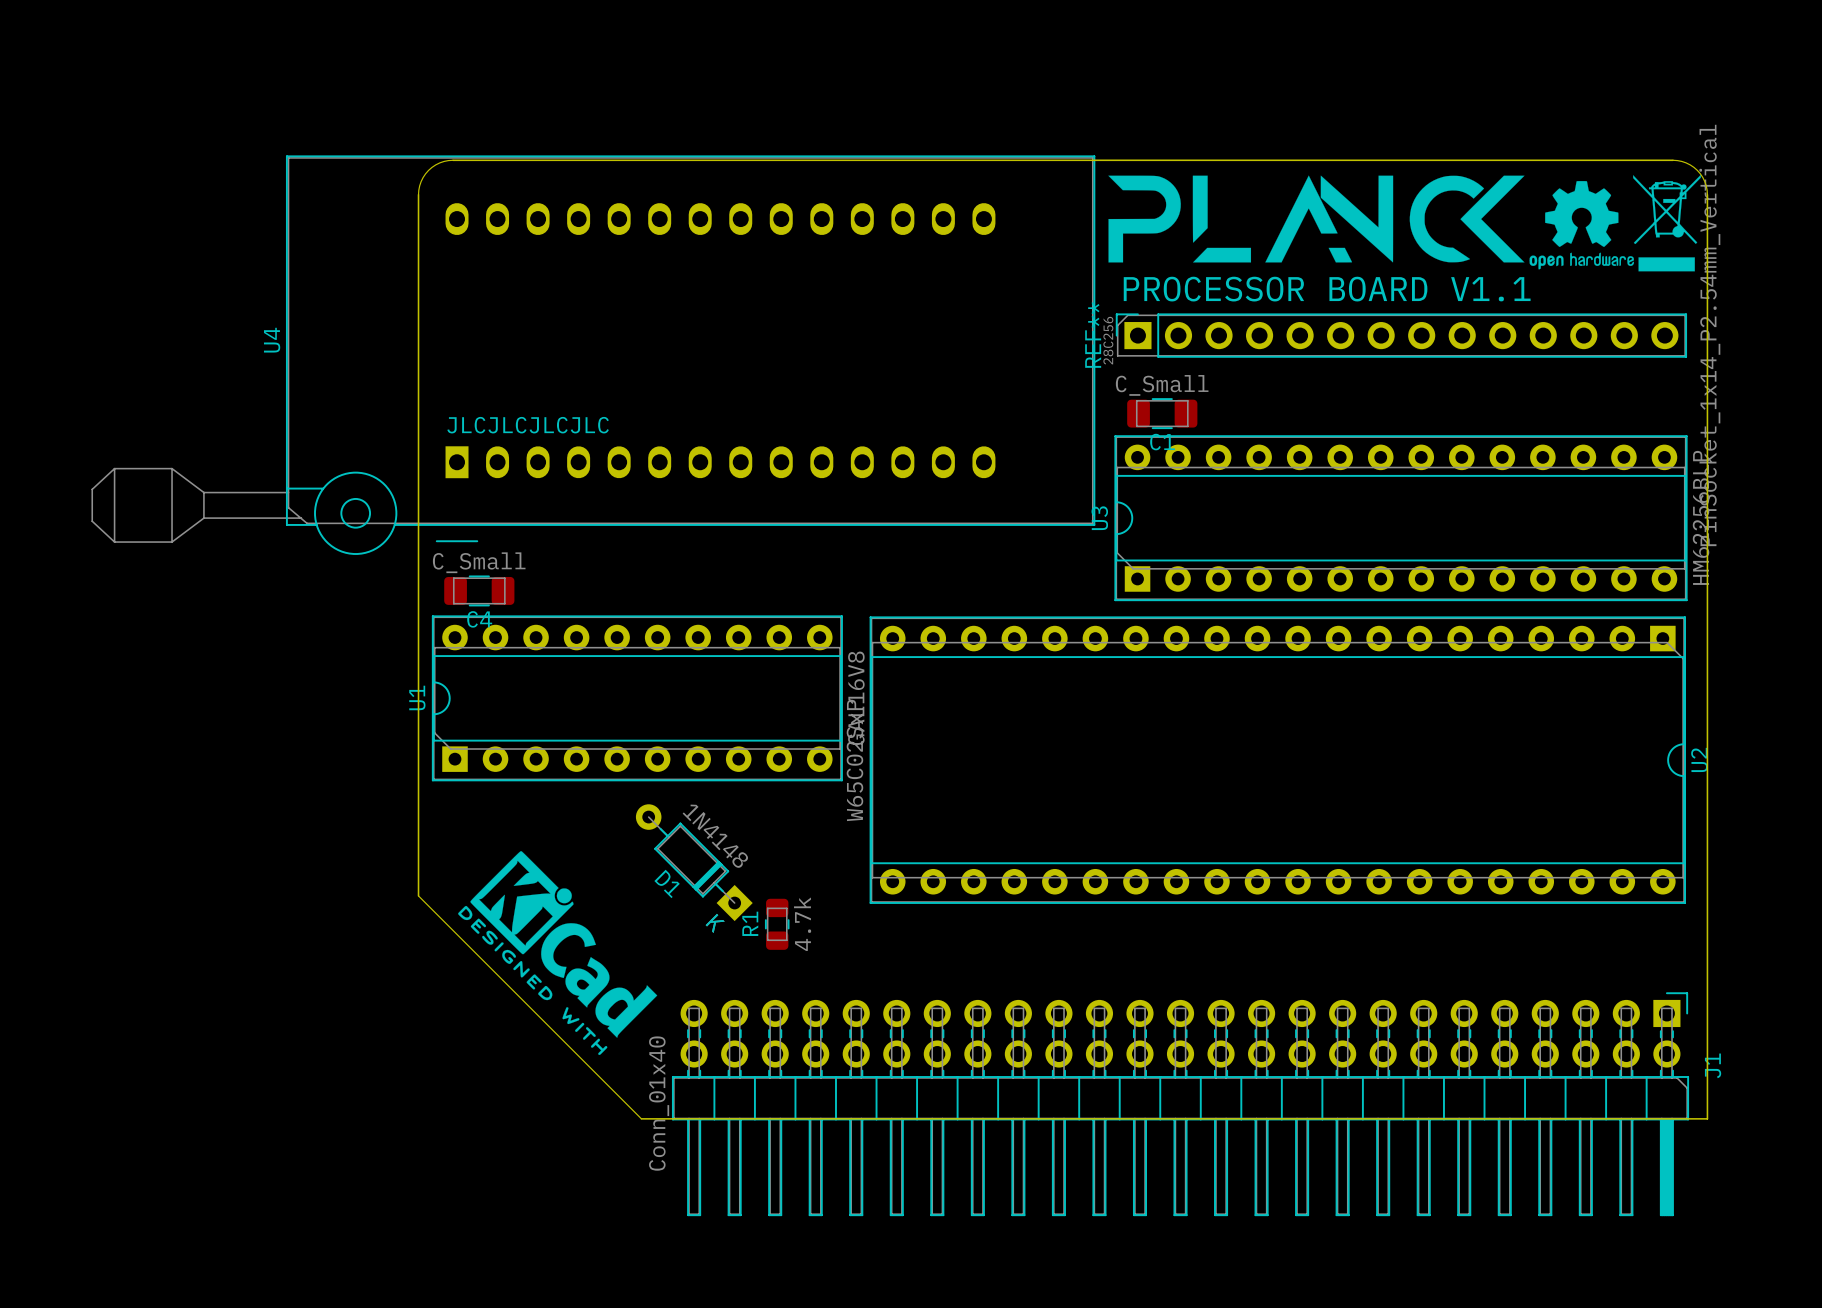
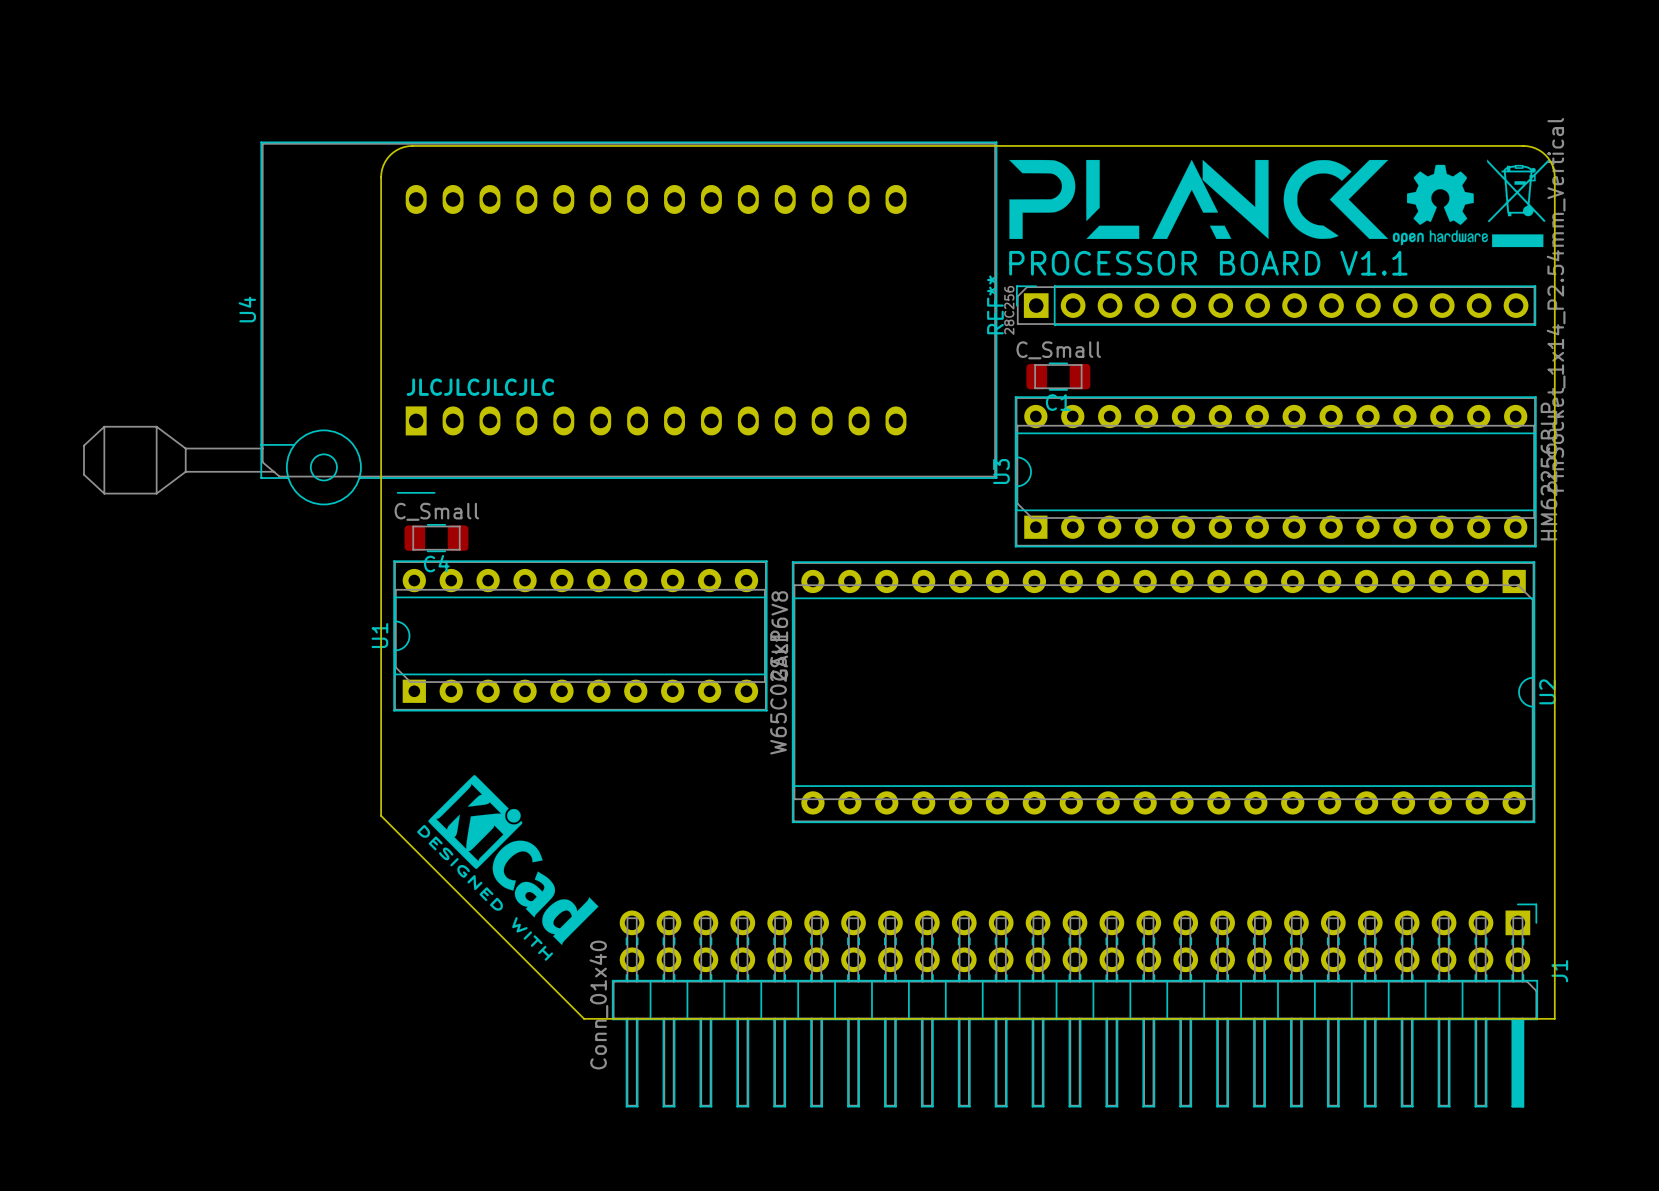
D1: 1N4148 (694, 862) -> none
R1: 4.7k (777, 924) -> none

